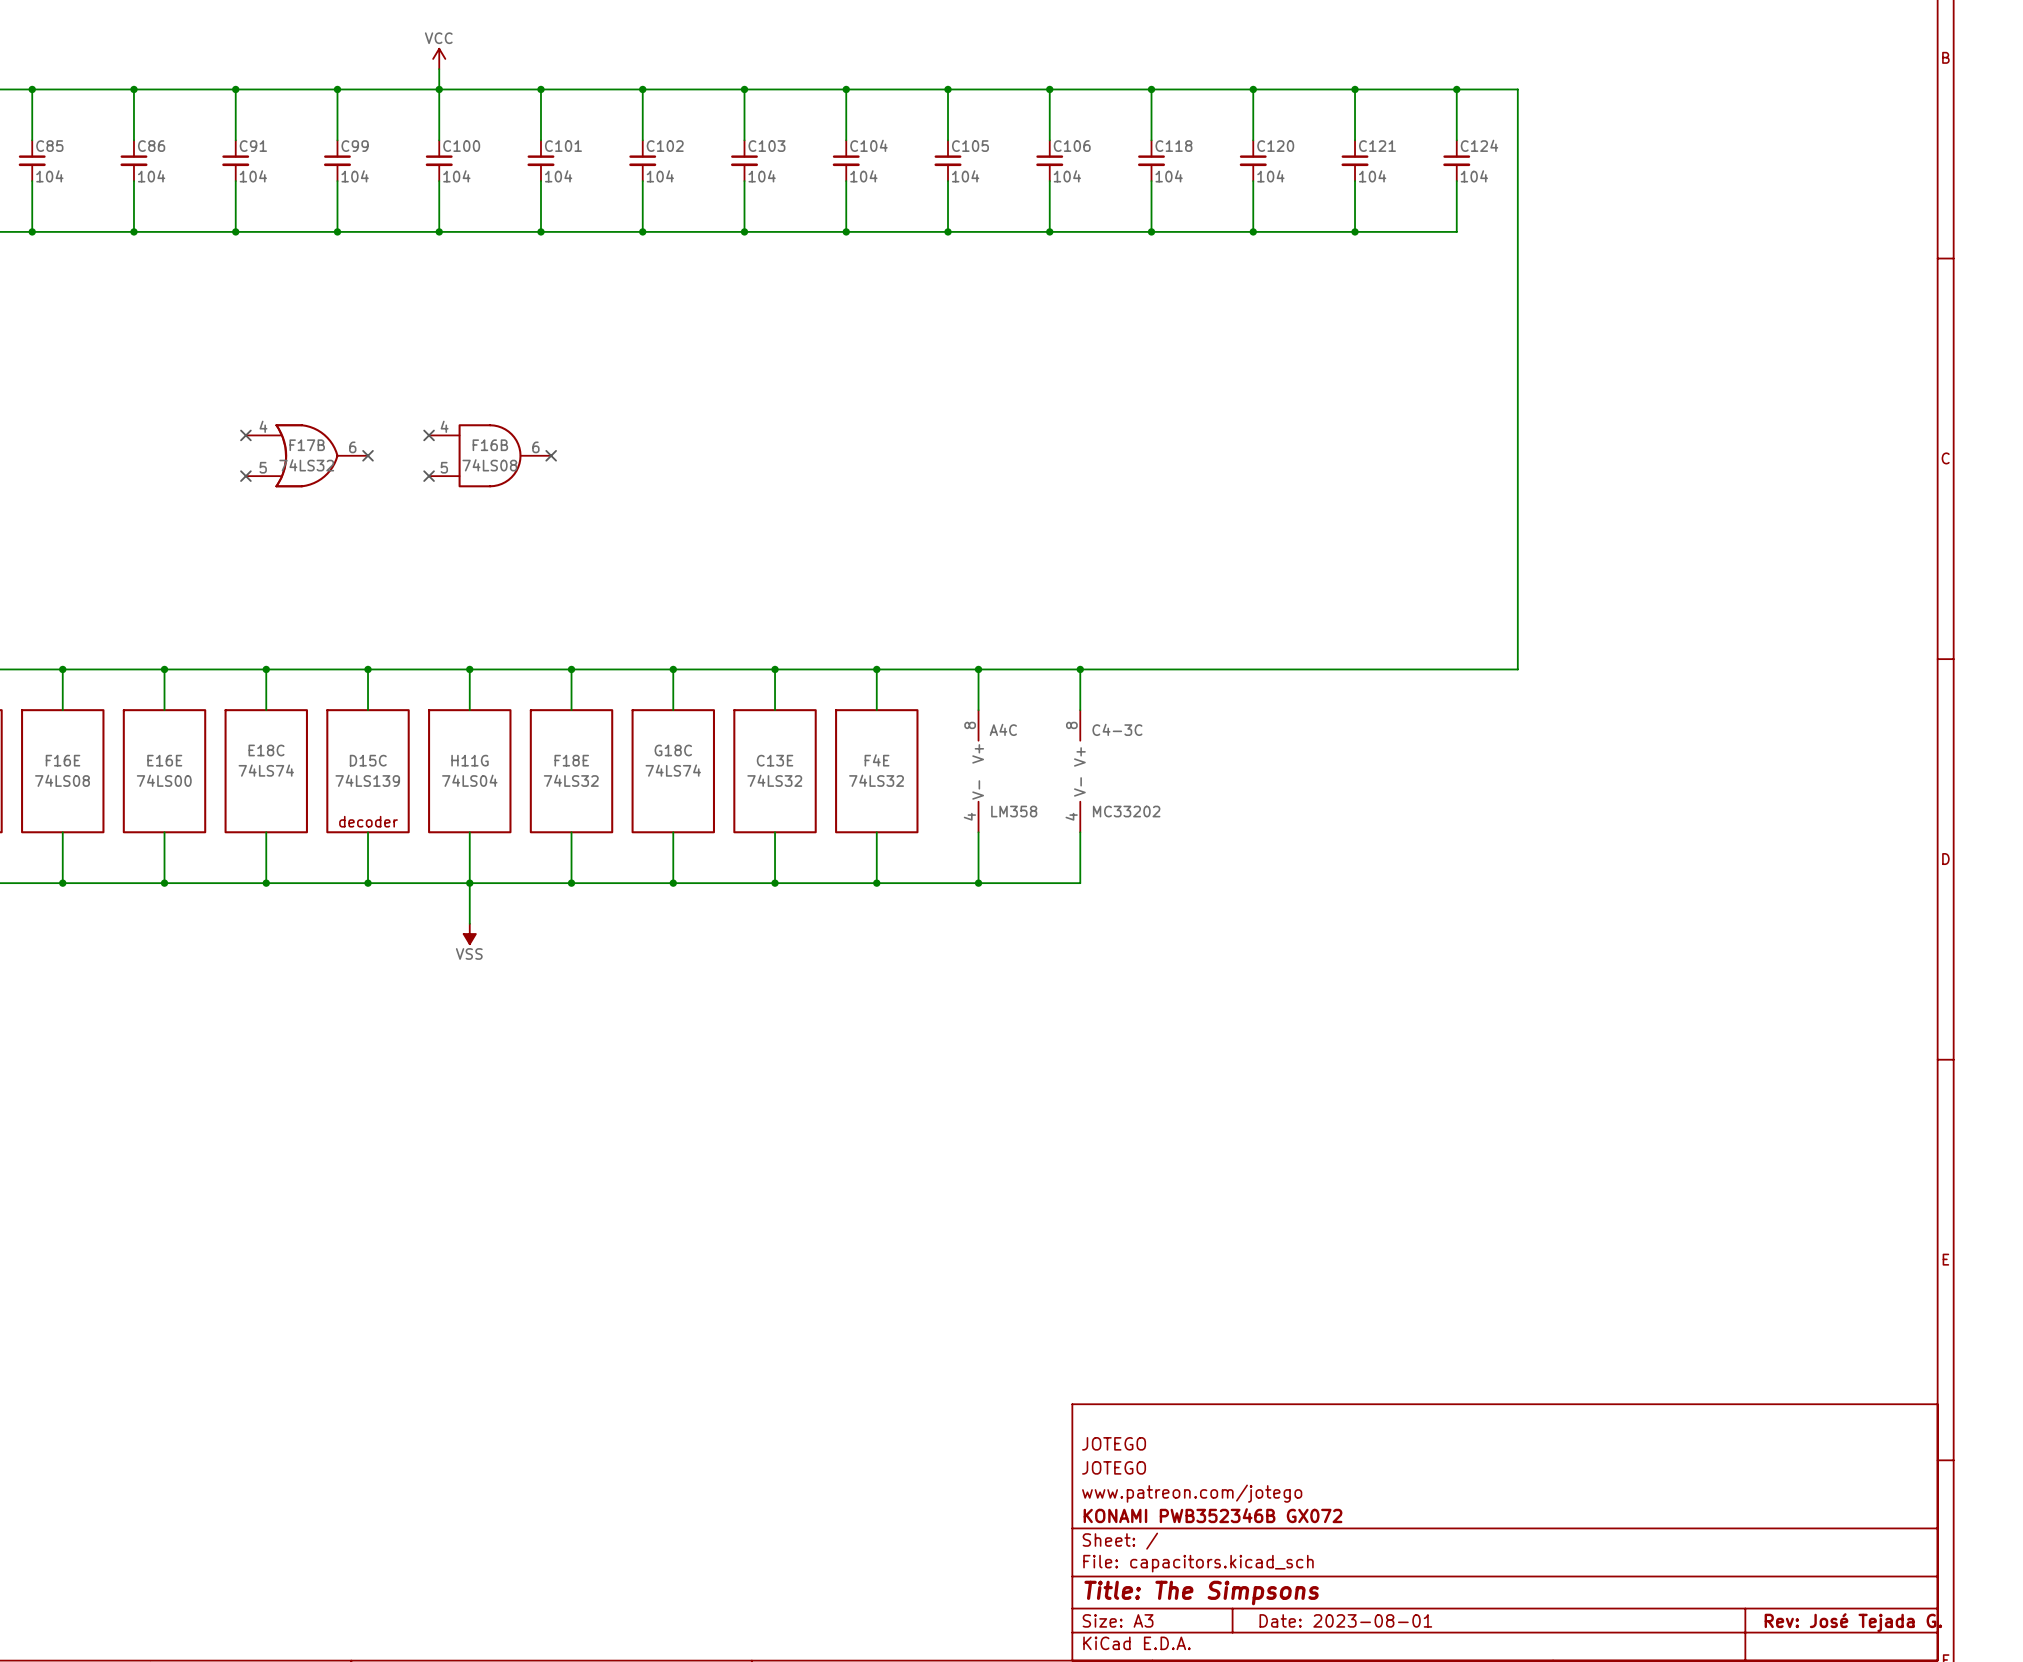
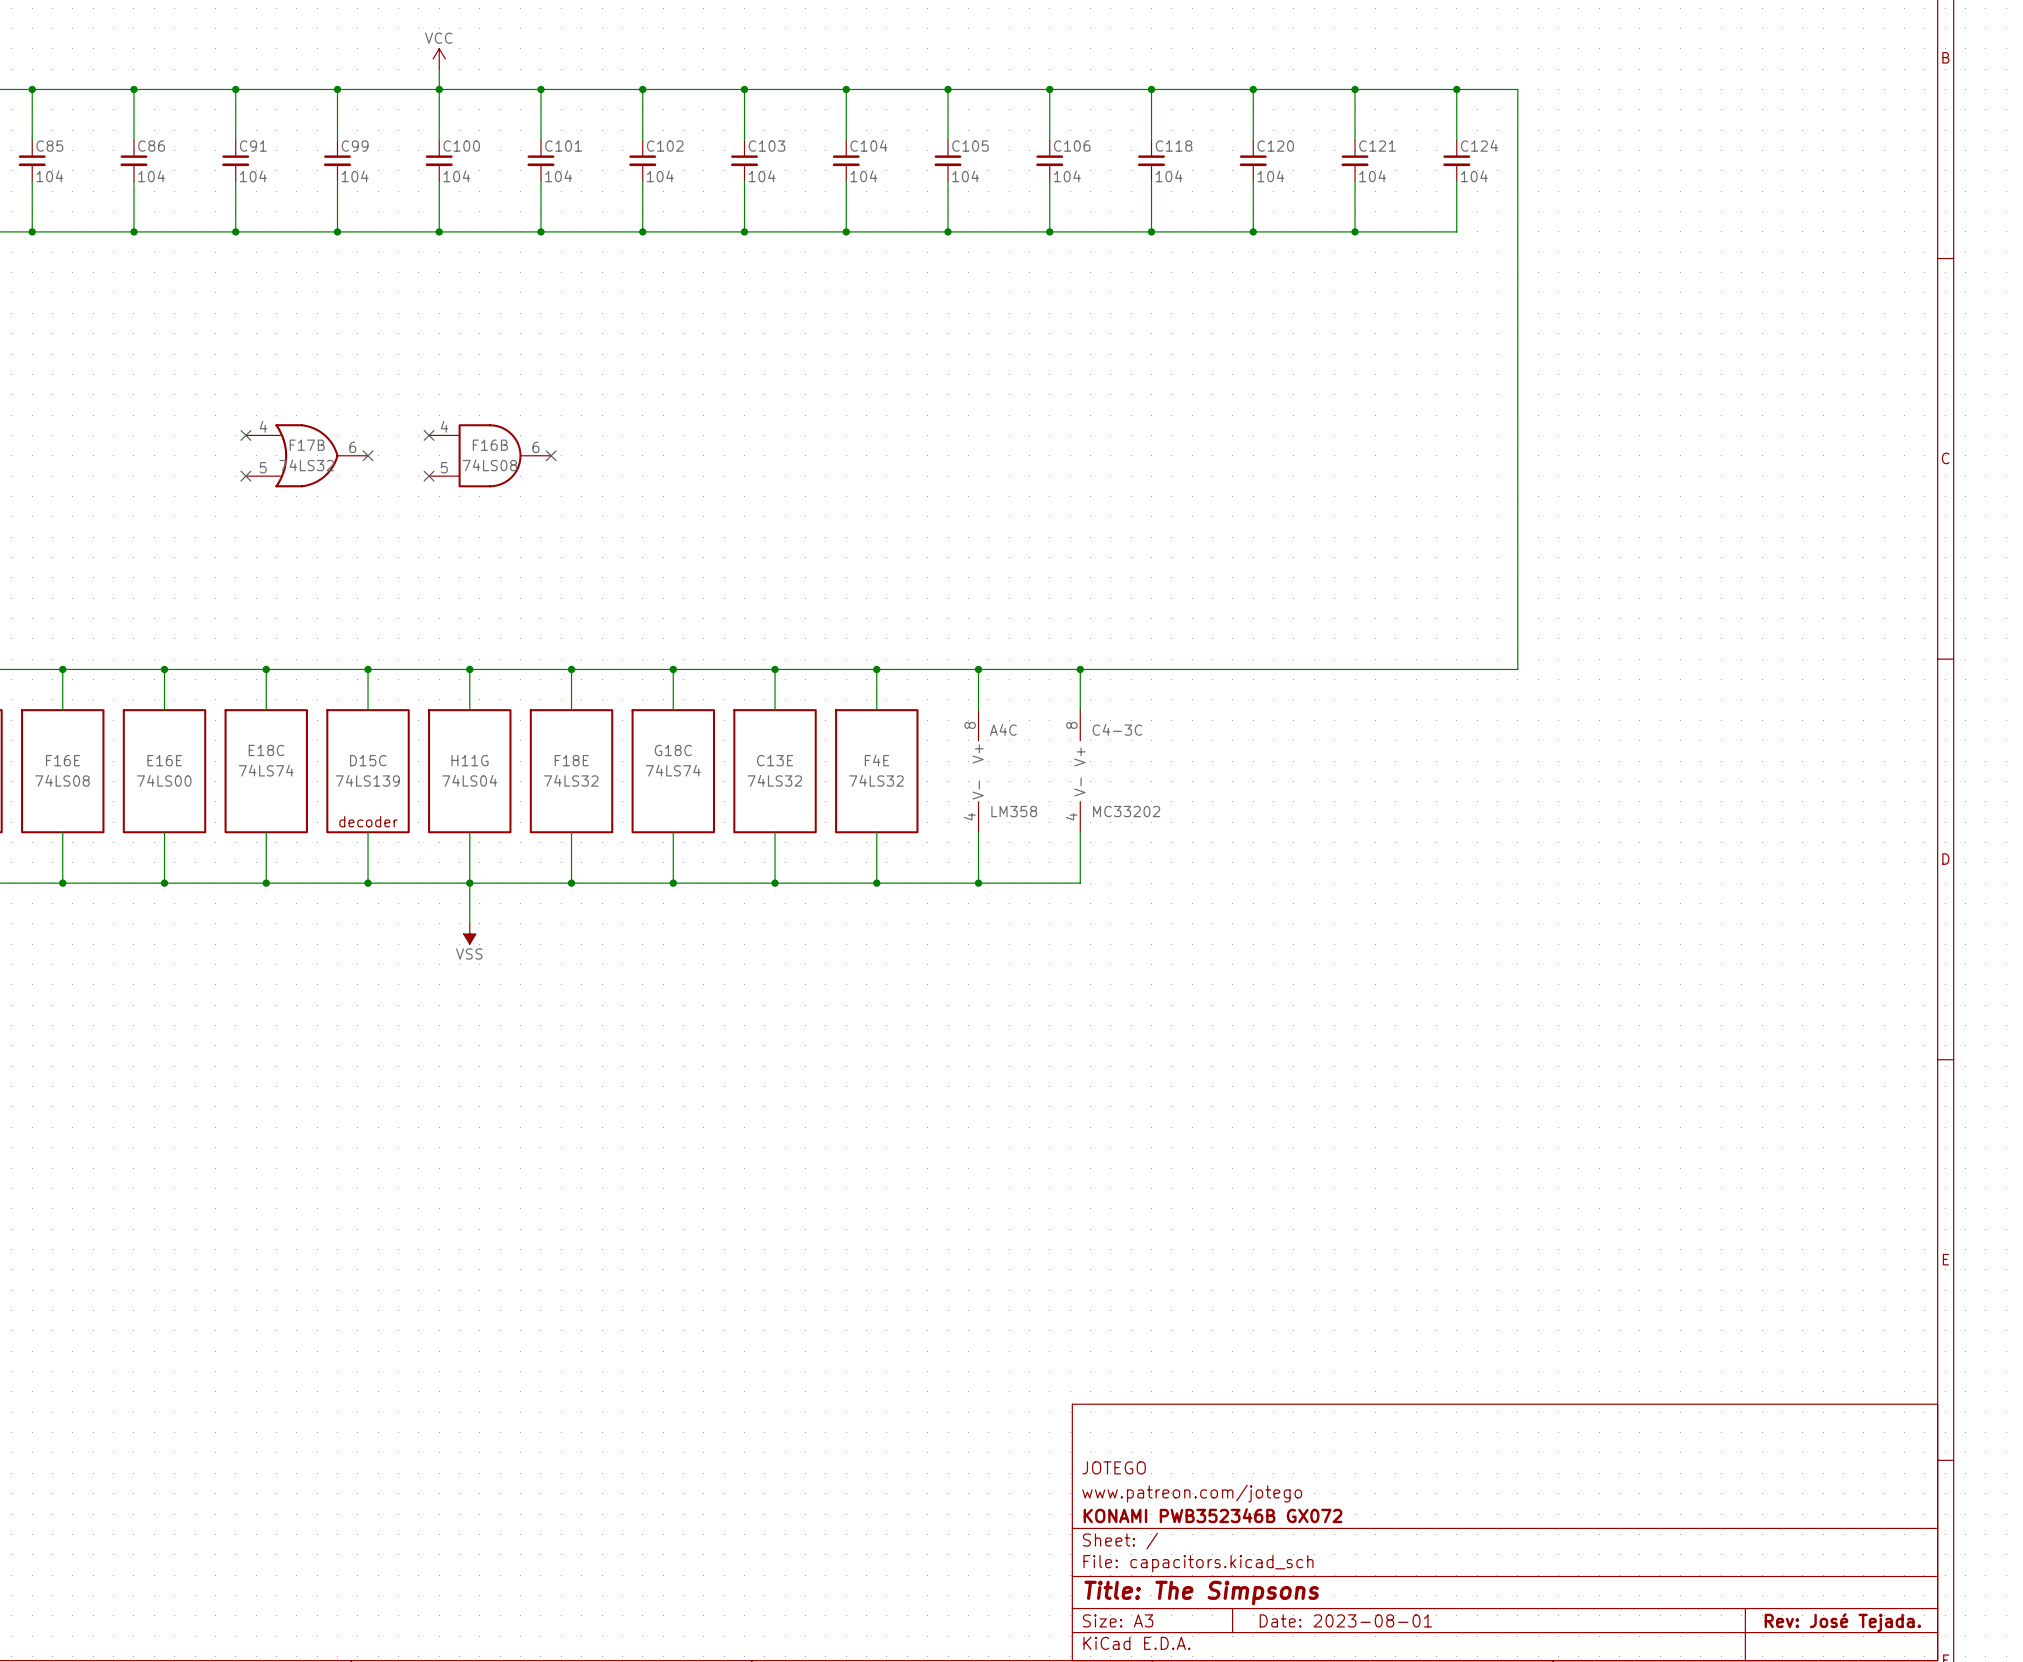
title block: JOTEGO (1114, 1443) -> none
title block: Rev: José Tejada G. (1853, 1622) -> Rev: José Tejada. (1842, 1622)

